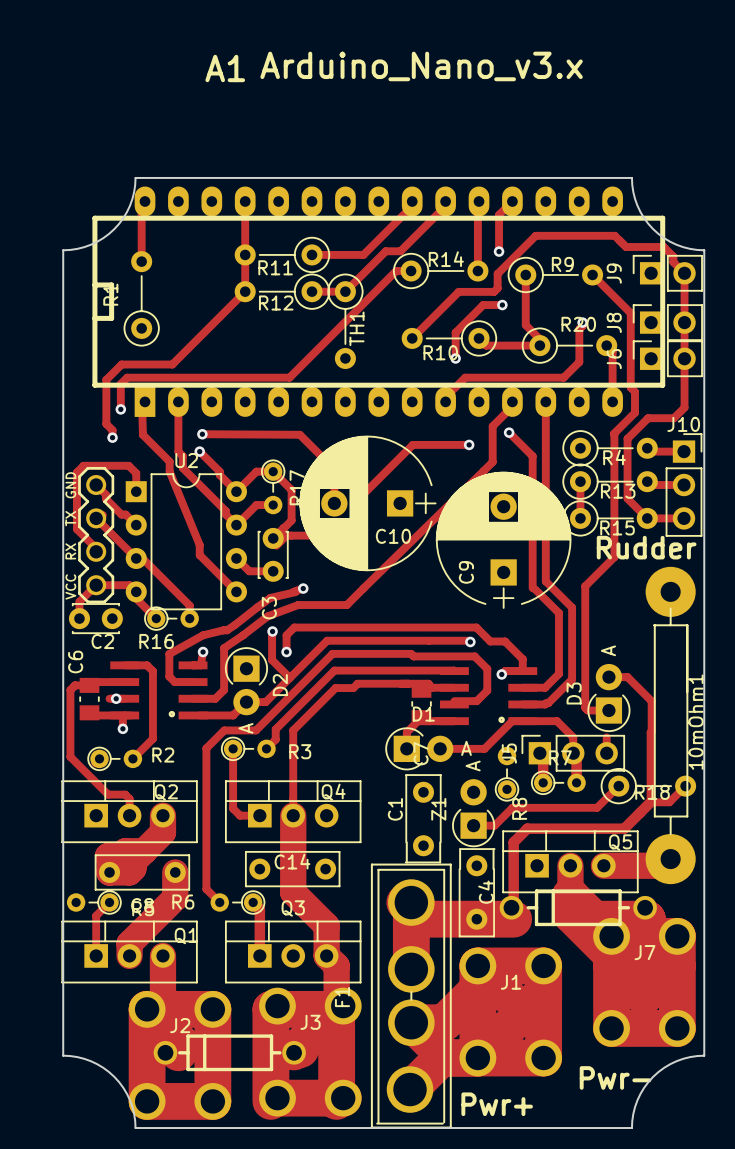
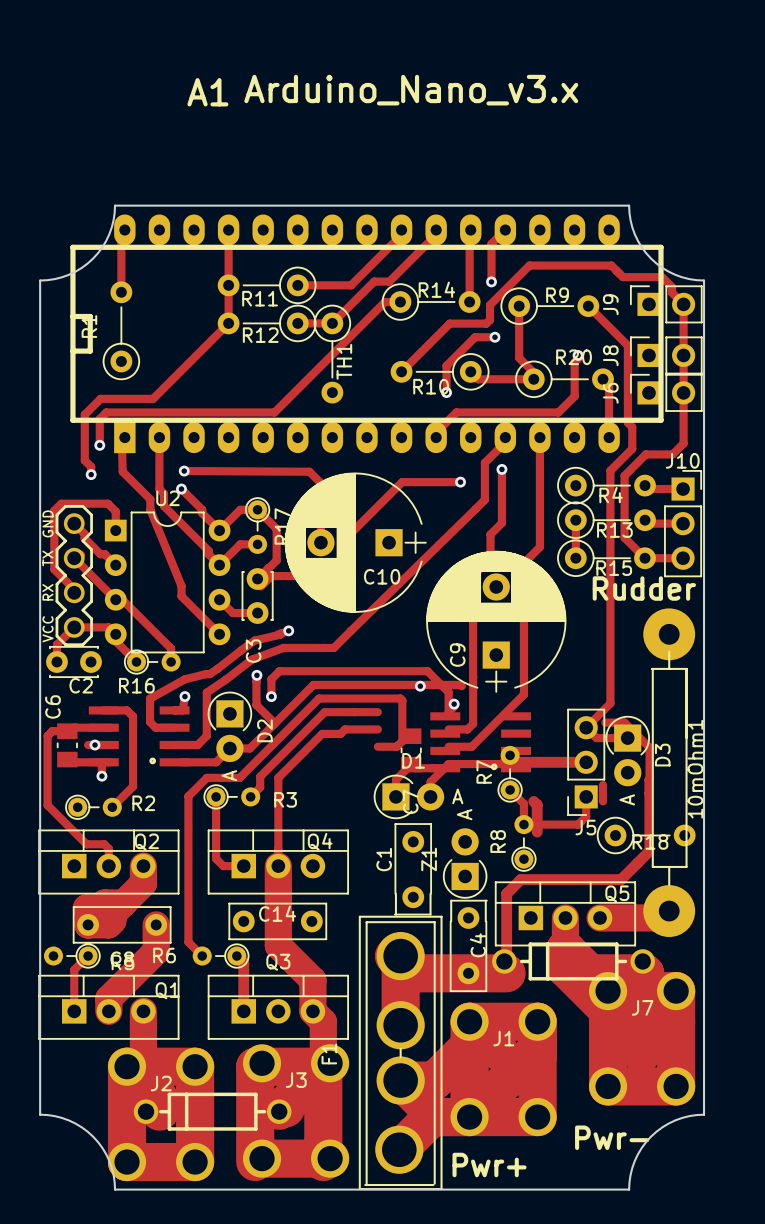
track: (509, 432) (532, 456) (532, 588) -> (501, 469) (501, 523) (490, 534) (490, 558) (473, 575) (473, 676)
track: (613, 433) (614, 557) (585, 586) (585, 707) (587, 710) (608, 710) -> (610, 470) (610, 703) (586, 727) (596, 738) (627, 738)
track: (299, 434) (334, 469) -> (285, 471) (309, 471) (320, 483) (320, 507)
track: (545, 507) (545, 581) (572, 607) (572, 679) (548, 703) (522, 704) -> (539, 547) (523, 563) (523, 694) (471, 746) (448, 746)
C9 position: (503, 540) -> (496, 621)
track: (535, 589) (558, 613) (558, 673) (545, 687) (522, 687) -> none
track: (437, 627) (476, 627) (490, 641) (505, 641) (522, 659) (522, 671) (505, 671) (501, 674) -> (427, 671) (448, 692) (448, 712) (454, 704)
track: none -> (473, 676) (473, 723) (467, 729) (448, 729)
via: none -> (420, 686)
via position: (470, 641) -> (454, 704)
track: (412, 655) (474, 656) (487, 668) (487, 690) (476, 701) (454, 701) -> (402, 700) (402, 741) (396, 746) (377, 746)
track: (334, 670) (454, 671) -> (321, 715) (324, 712) (377, 712)
via: (501, 674) -> none
track: (389, 683) (428, 683) (432, 687) (454, 687) -> none
D3 rotation: 0° (608, 697) -> 180° (627, 751)
track: none -> (510, 789) (523, 803) (523, 824) (578, 824) (586, 816) (586, 796)
track: (440, 748) (484, 748) (512, 721) (557, 721) (573, 737) (573, 753) (576, 756) (576, 782) -> (430, 796) (430, 782) (448, 764) (501, 764) (510, 755) (517, 762) (586, 762)
J5 rotation: 0° (573, 753) -> 90° counterclockwise (586, 762)
R8 position: (507, 774) -> (523, 843)
R7 rotation: 0° (558, 782) -> 90° counterclockwise (510, 774)
R7 position: (558, 782) -> (510, 774)
track: (618, 786) (597, 807) (512, 807) (494, 825) (473, 825) -> none
track: (685, 786) (669, 802) (650, 802) -> none
R8 name position: R8 (519, 808) -> R8 (498, 841)

